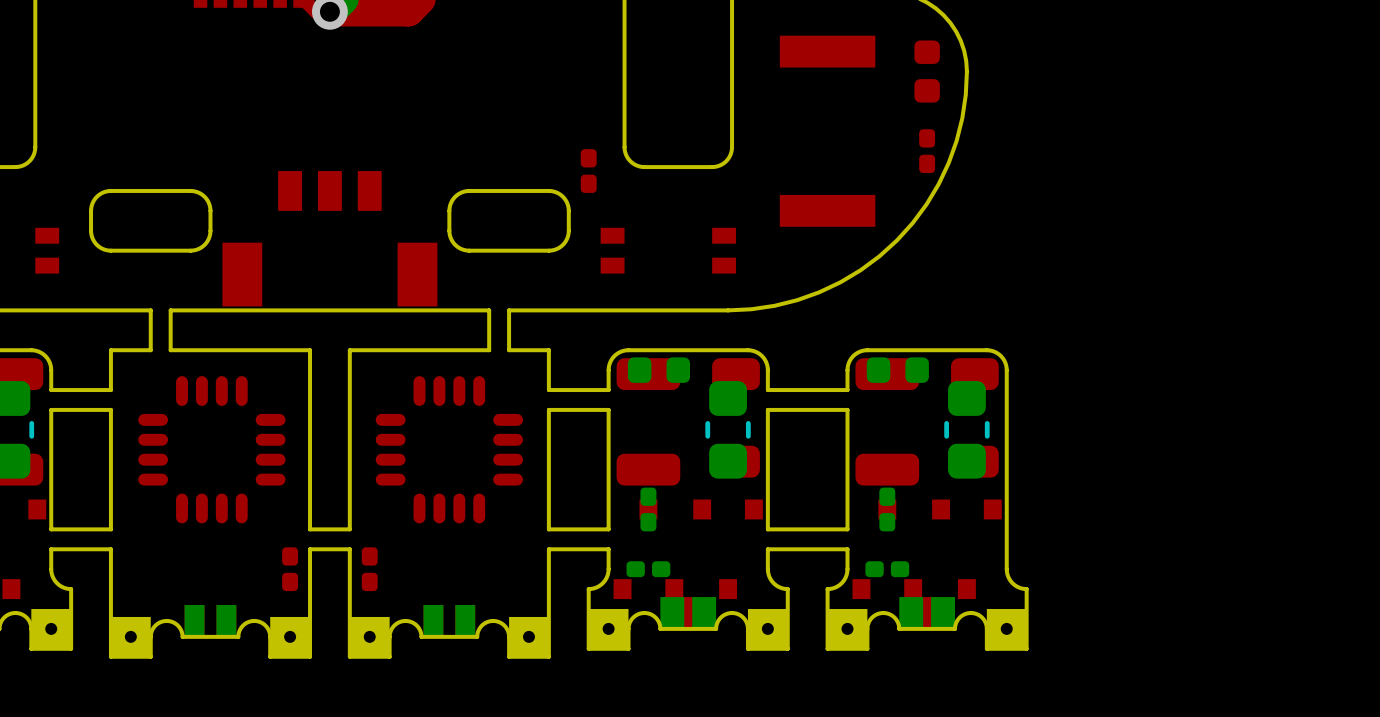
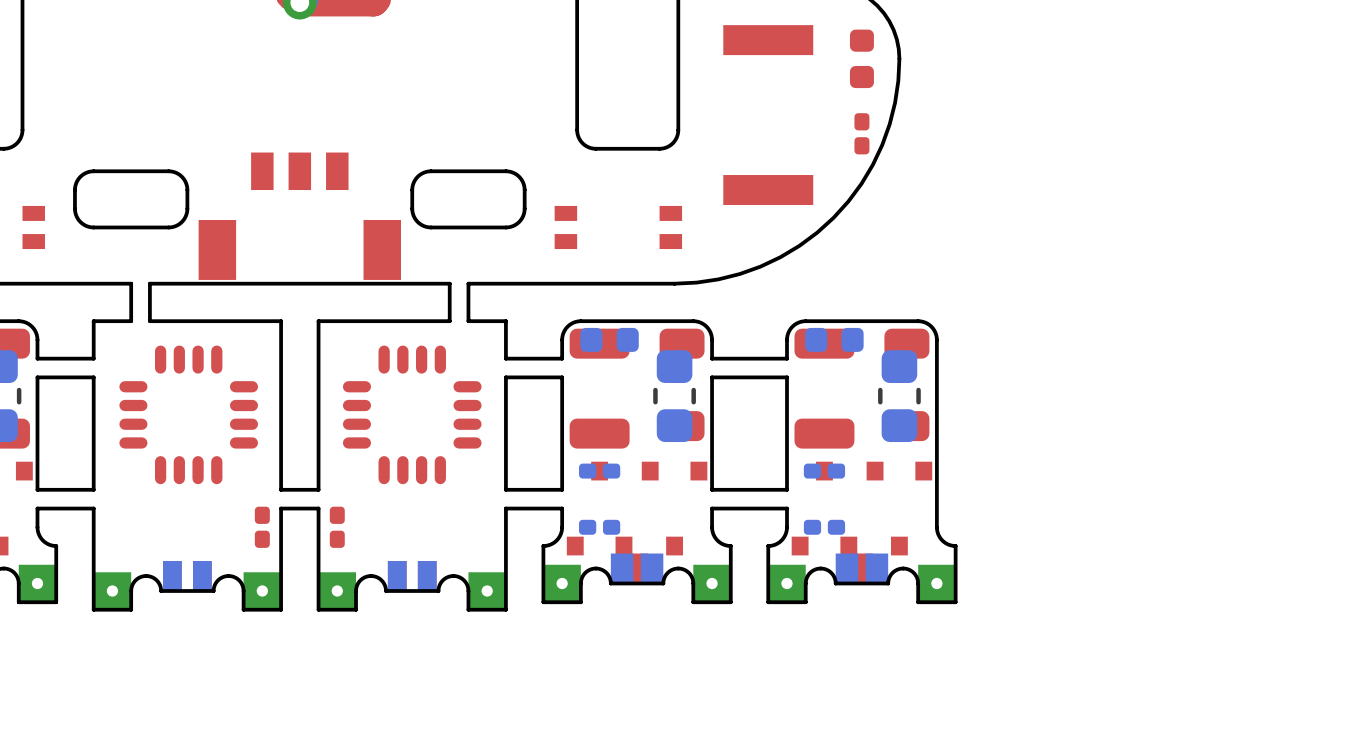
part: (588, 171) -> none
part rotation: 0° (648, 509) -> 90° clockwise (599, 471)
part rotation: 0° (887, 509) -> 90° clockwise (824, 471)

